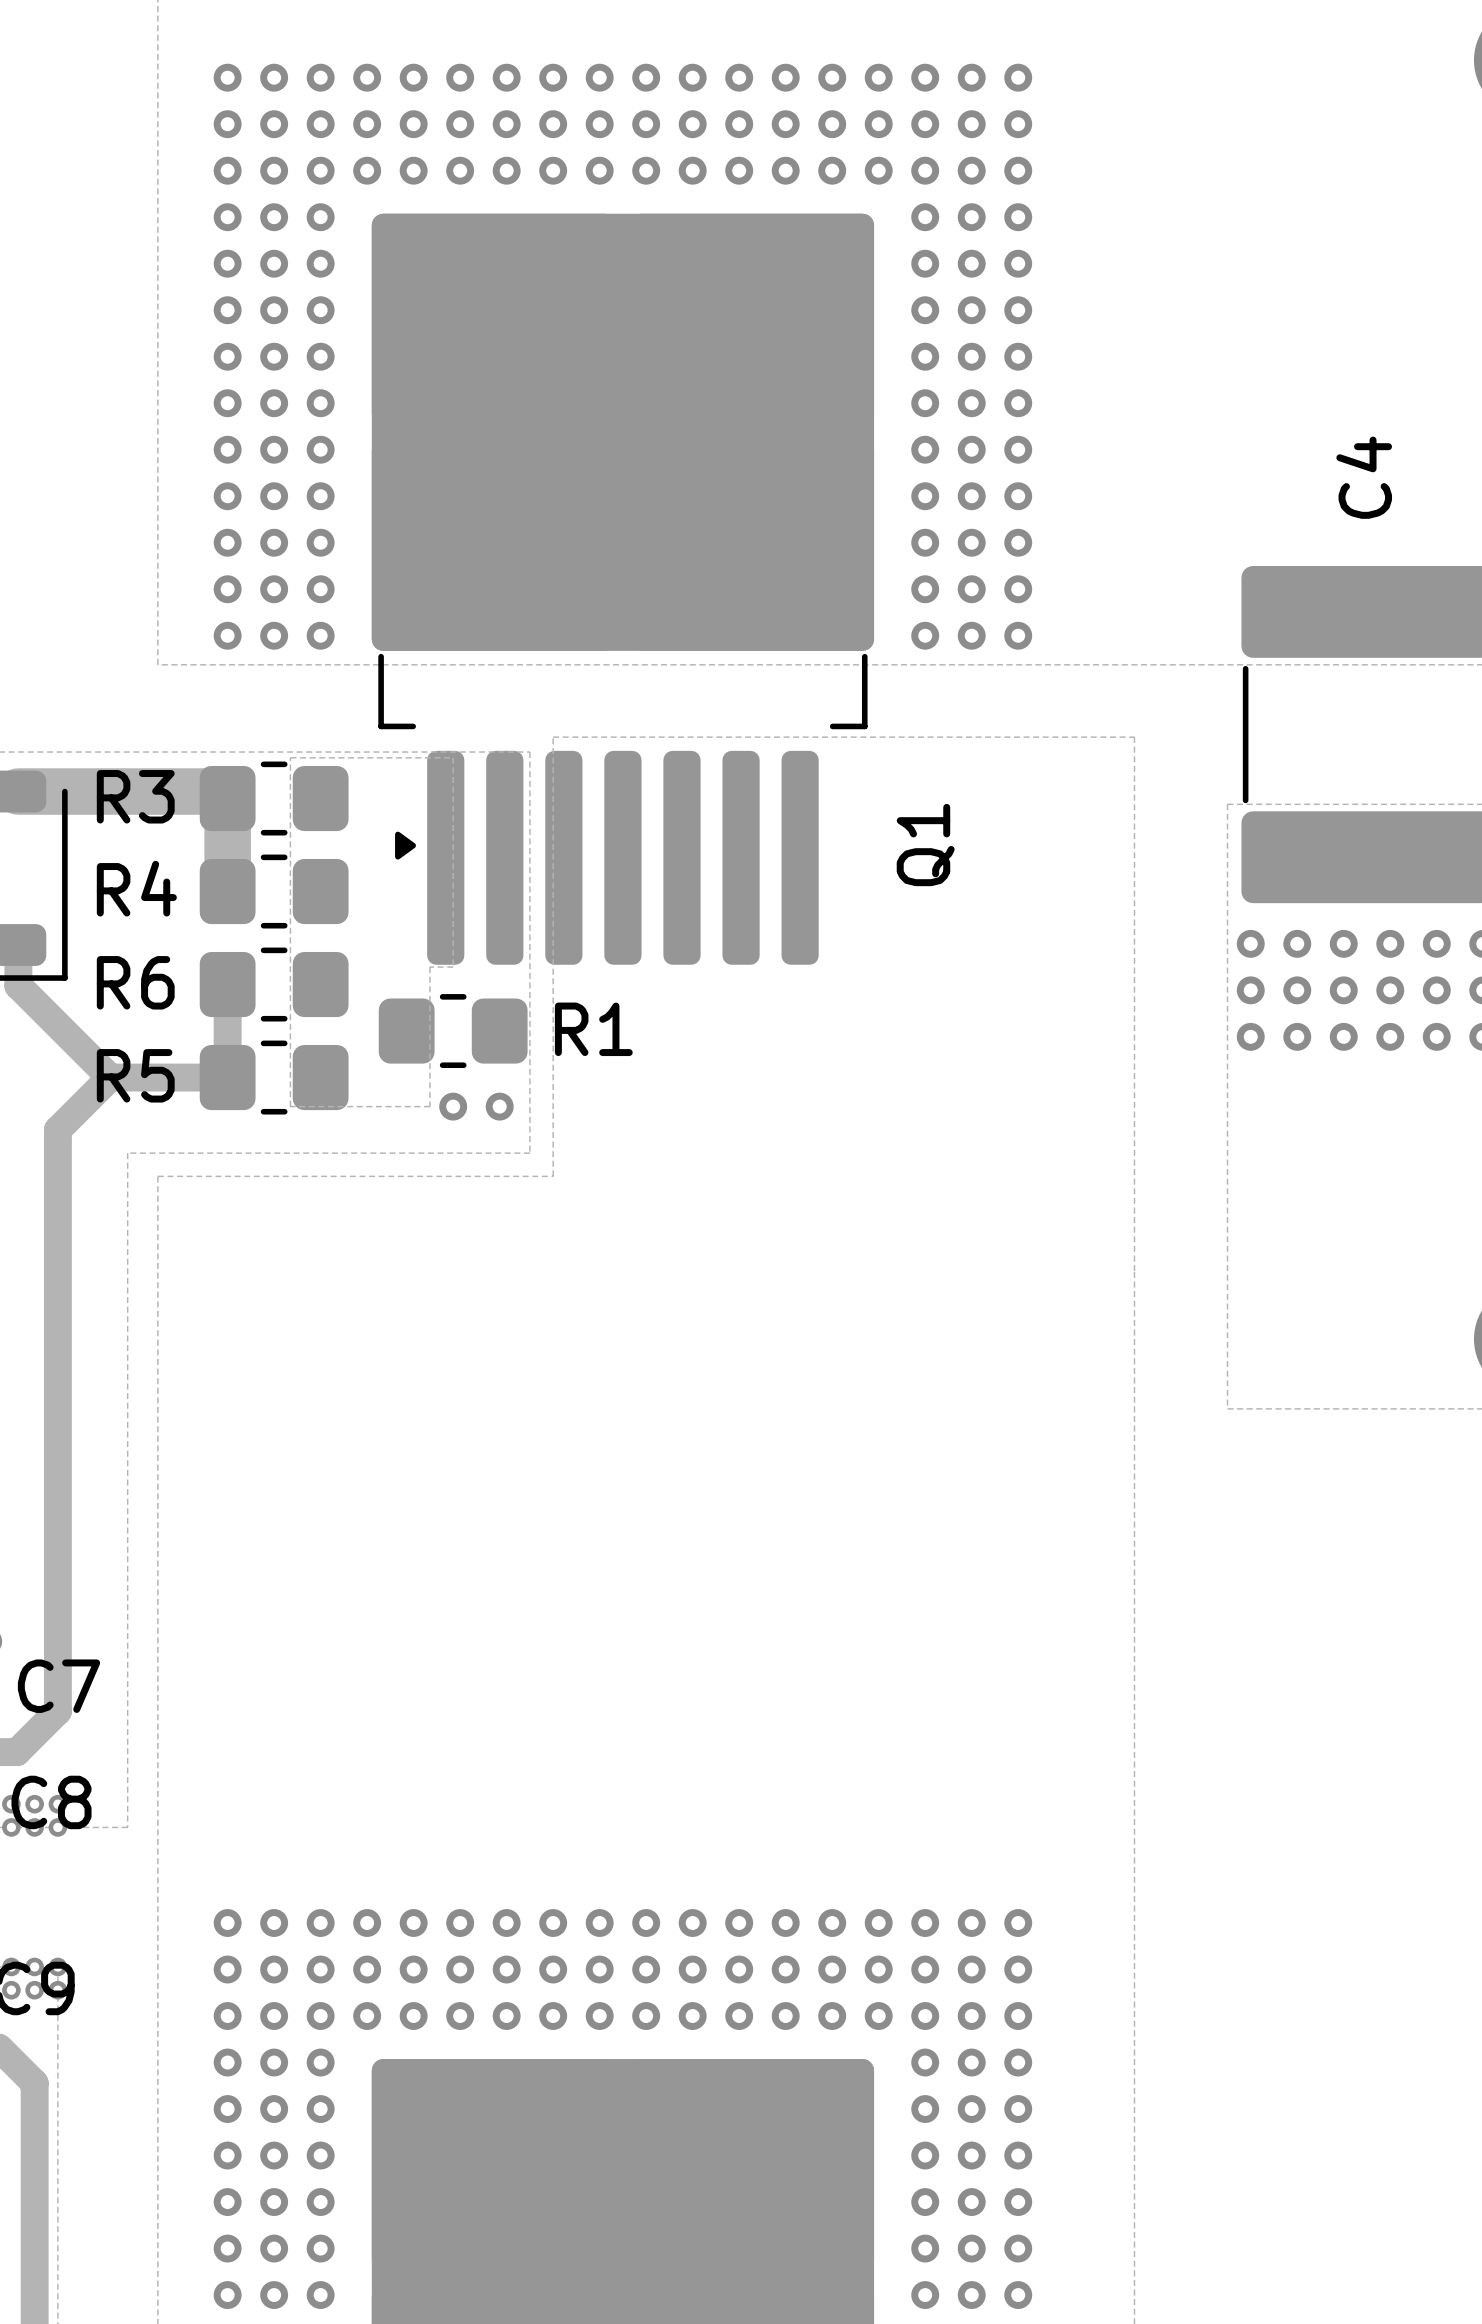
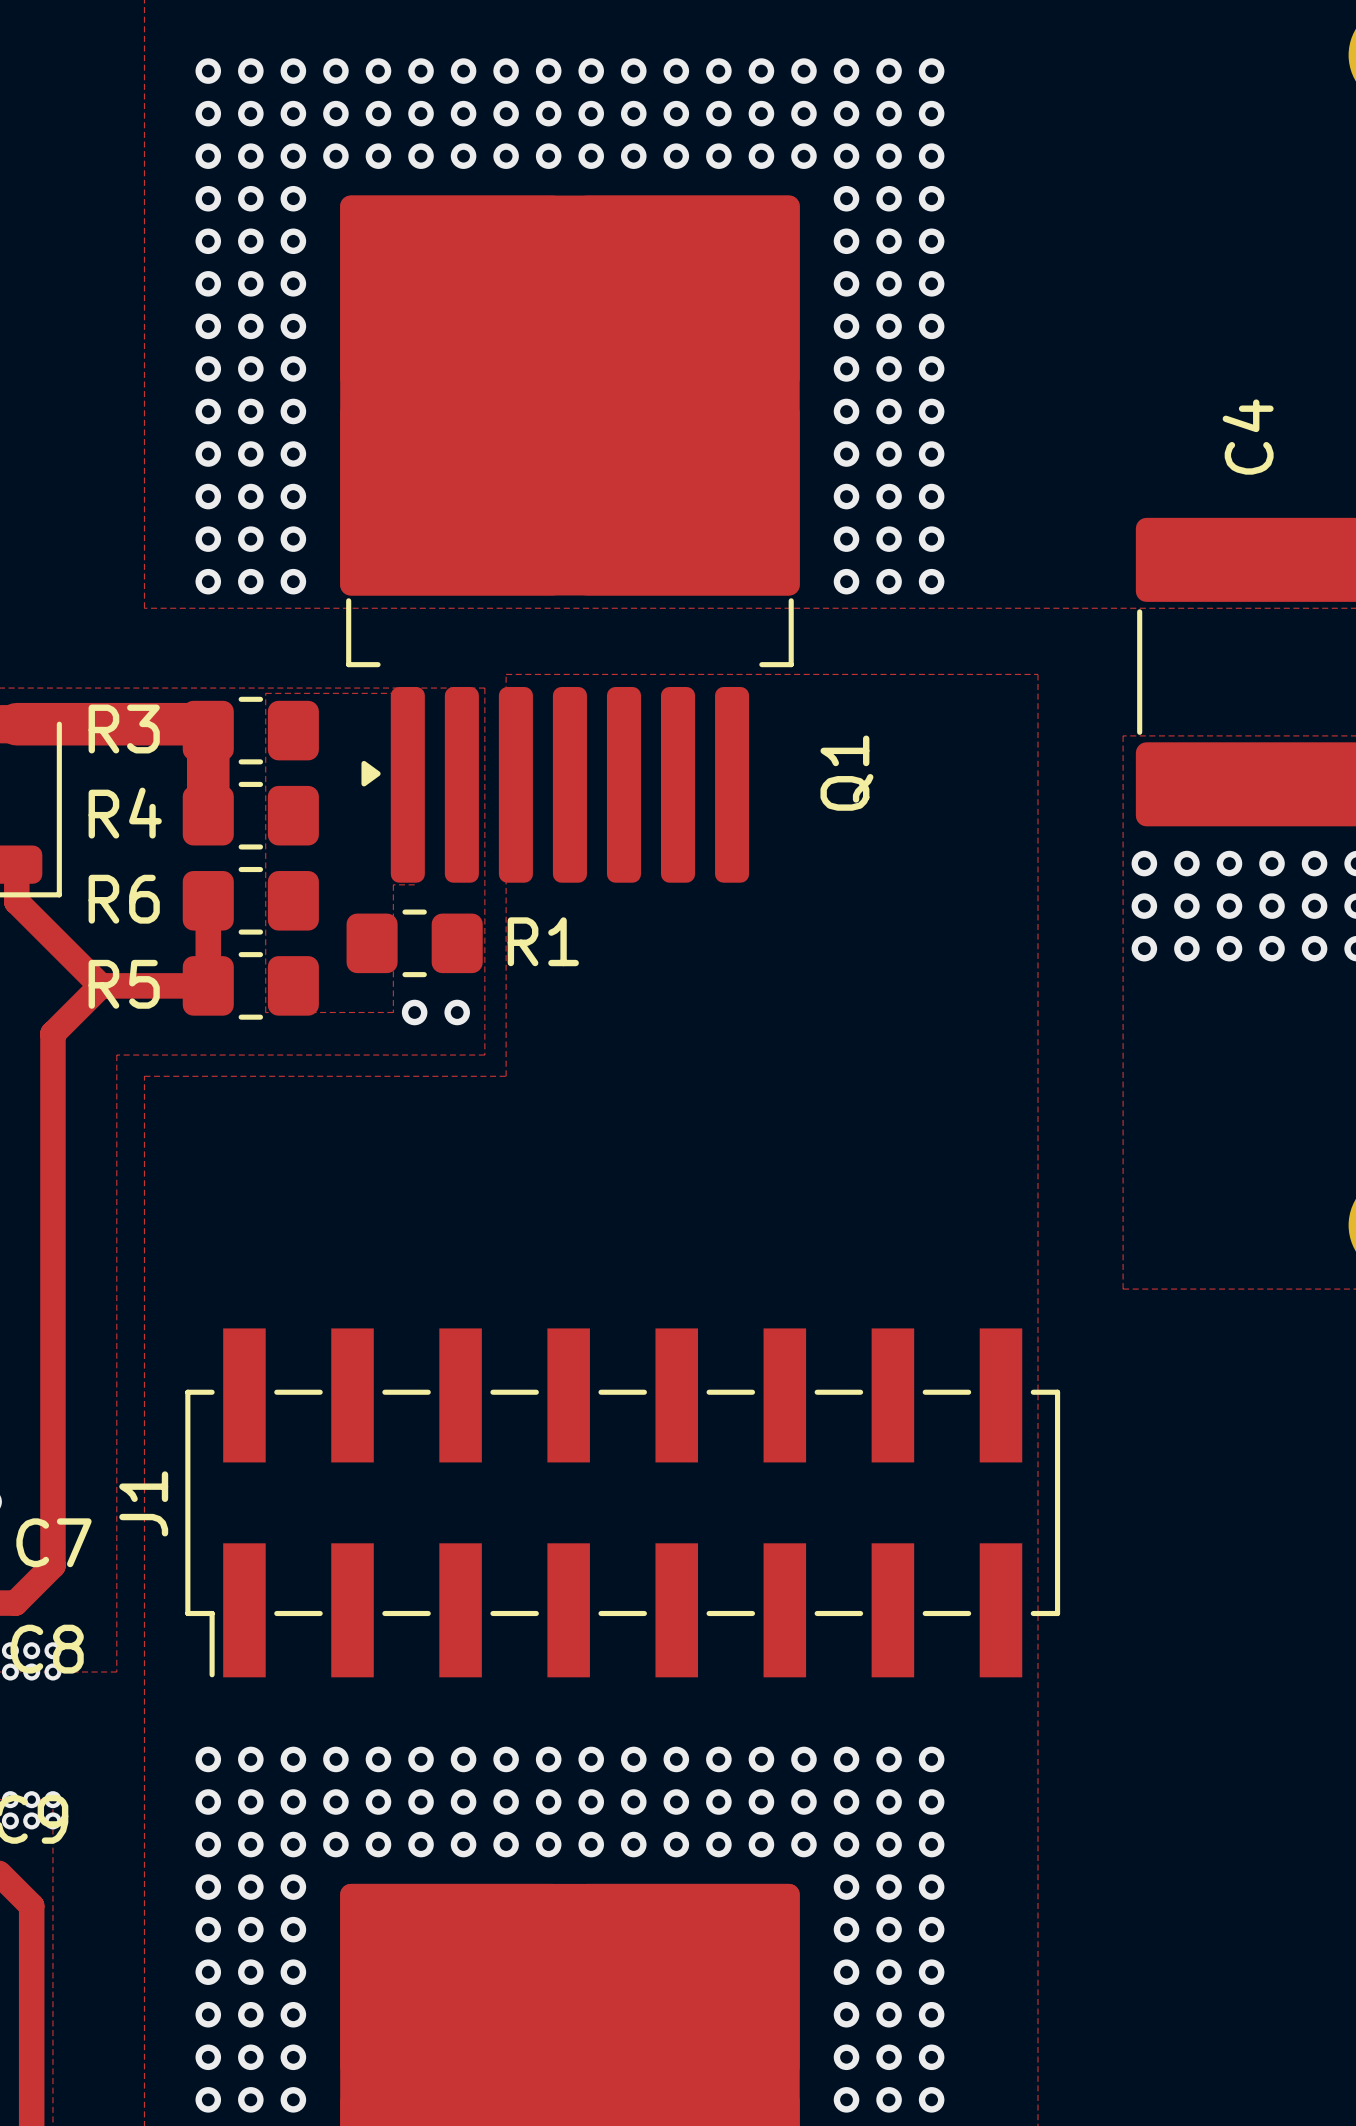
J1: none -> (622, 1502)

